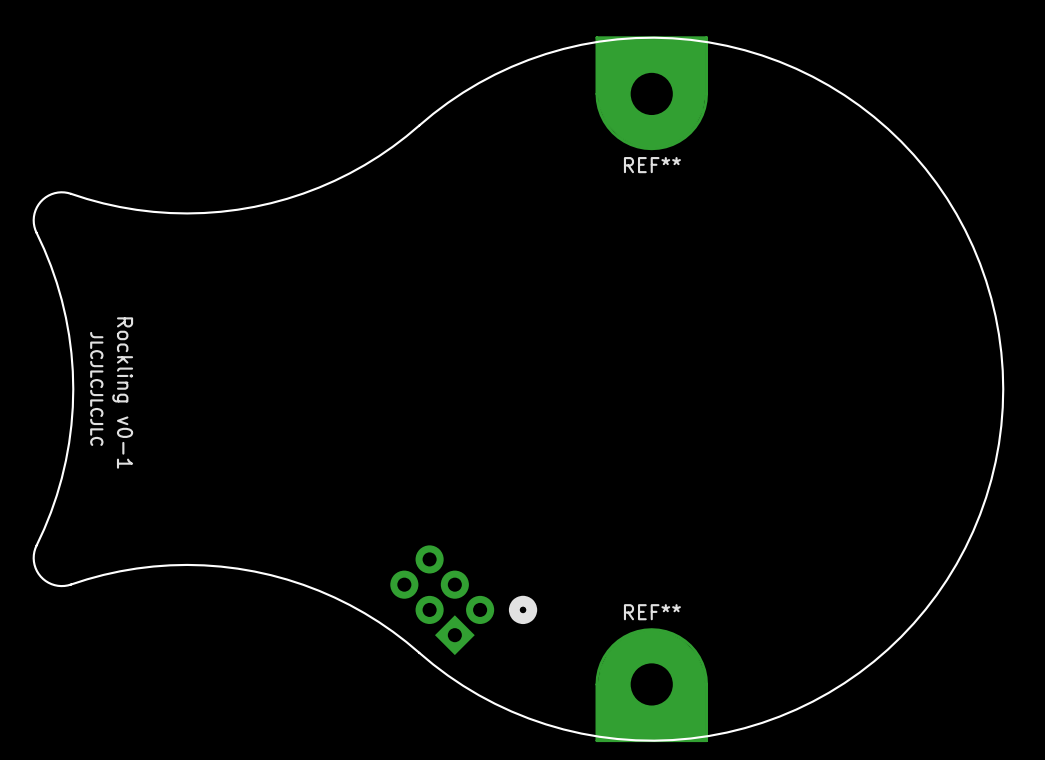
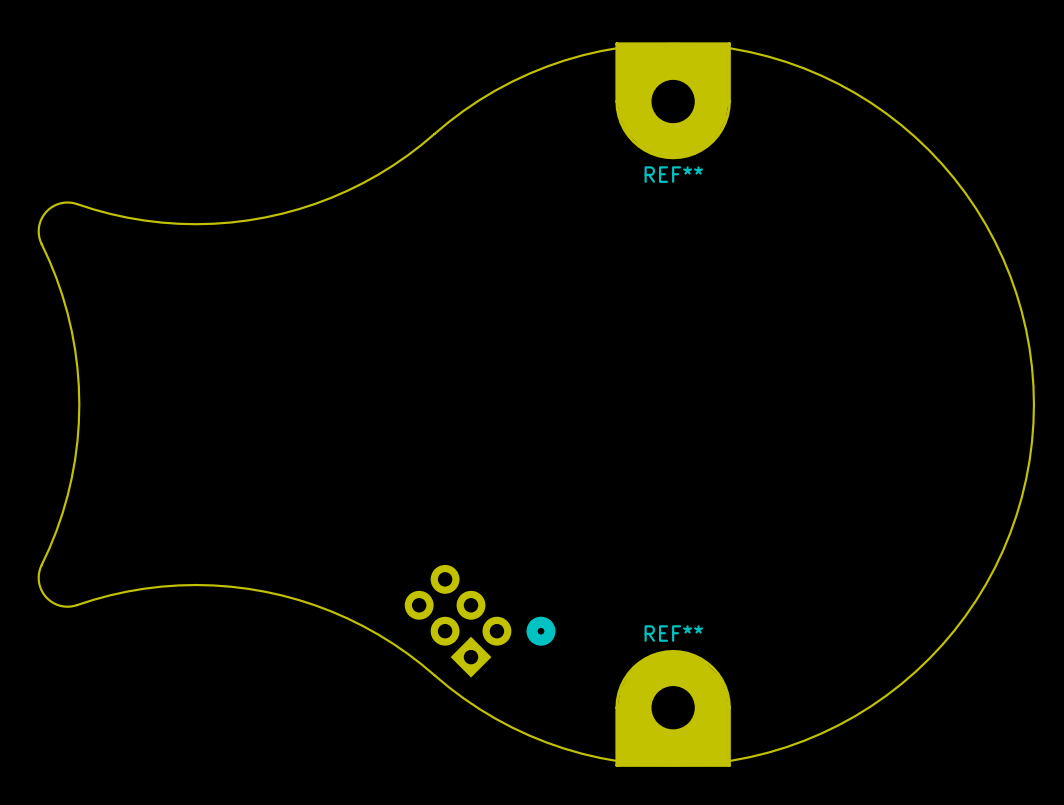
text: JLCJLCJLCJLC (96, 388) -> none
text: Rockling v0-1 (122, 393) -> none

